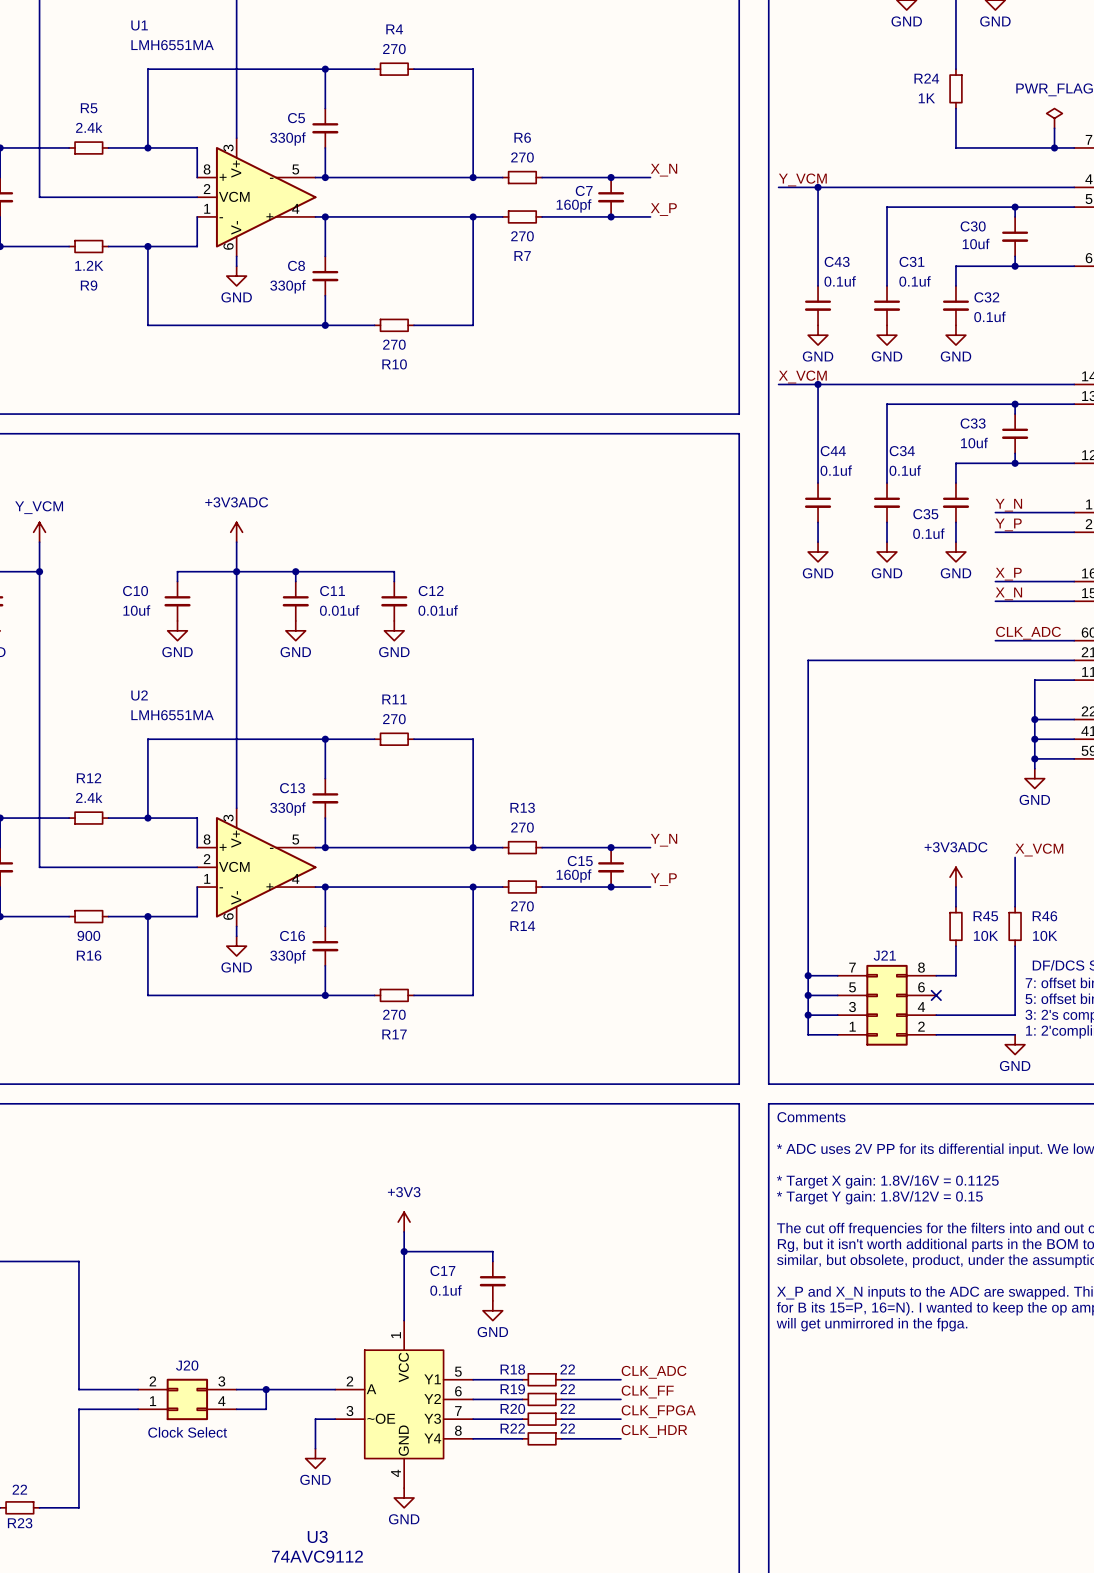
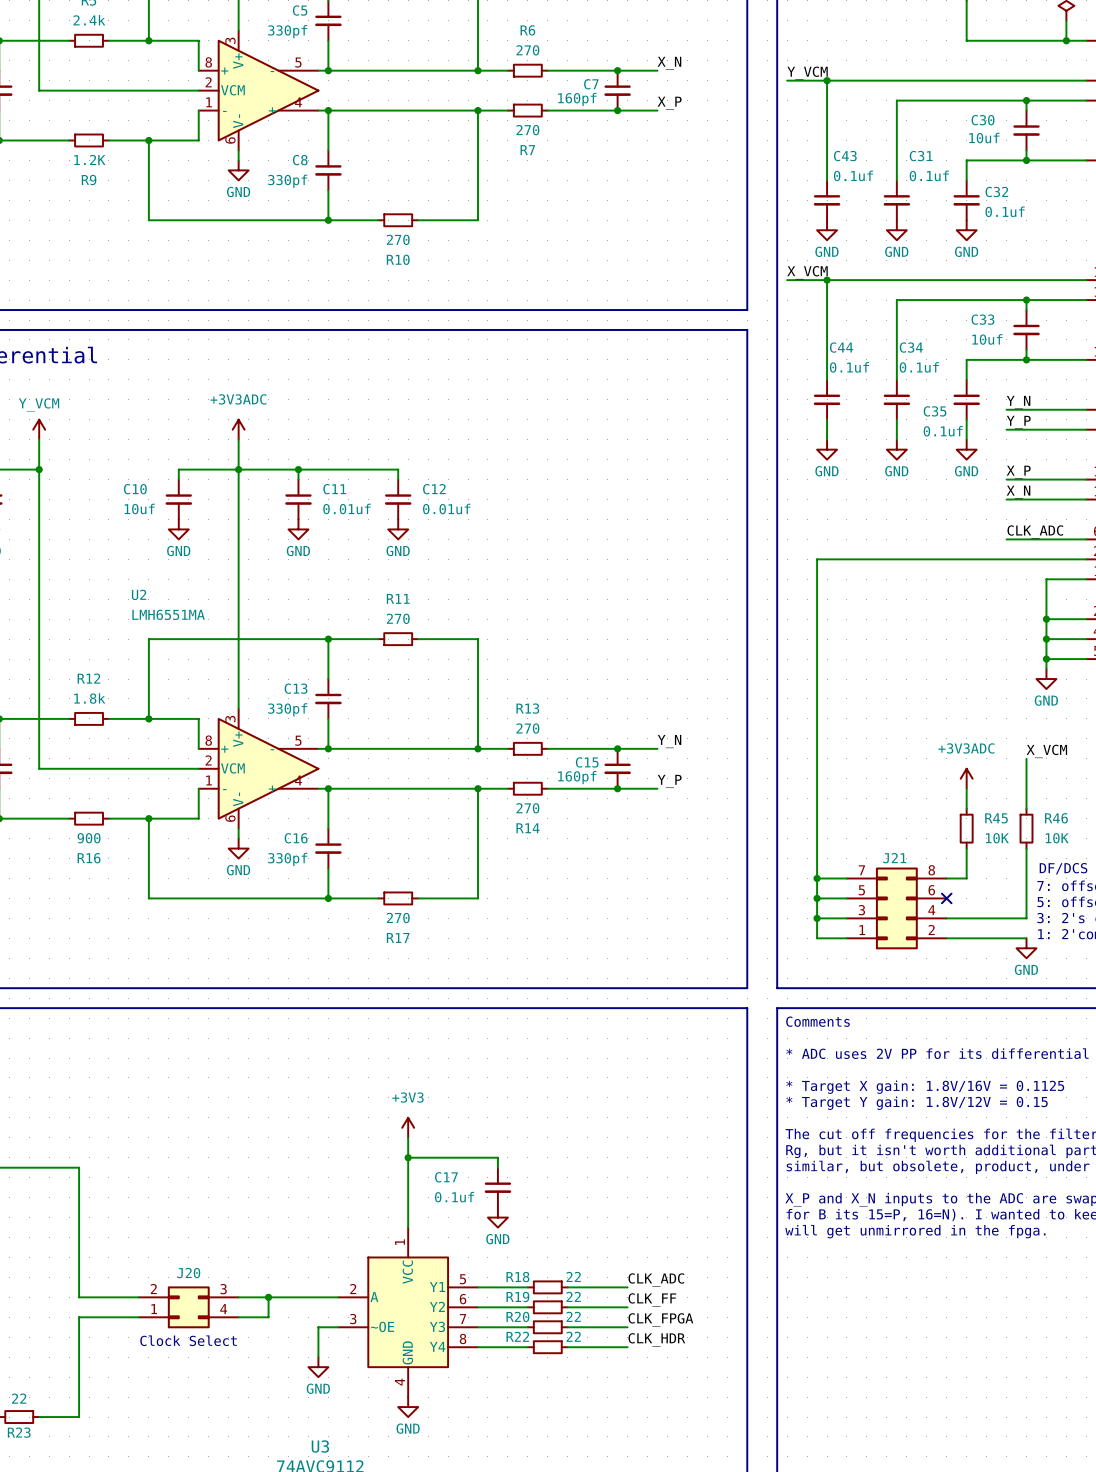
R12 value: 2.4k (89, 797) -> 1.8k (89, 698)

